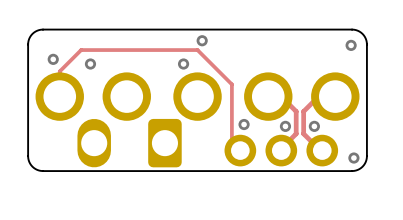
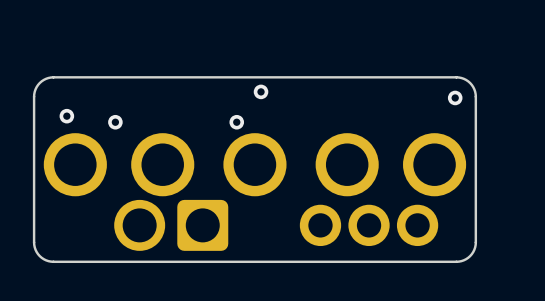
track: (59, 96) (59, 71) (81, 50) (197, 50) (231, 84) (231, 144) (238, 150) -> none
track: (268, 96) (281, 96) (296, 111) (296, 133) (279, 150) -> none
track: (335, 96) (318, 96) (303, 111) (303, 133) (320, 150) -> none
part footprint: [77, 118, 182, 168] -> [114, 199, 229, 251]
via: (244, 124) -> none
via: (285, 126) -> none
via: (314, 126) -> none
part footprint: [224, 134, 339, 167] -> [299, 204, 439, 247]
via: (353, 158) -> none

